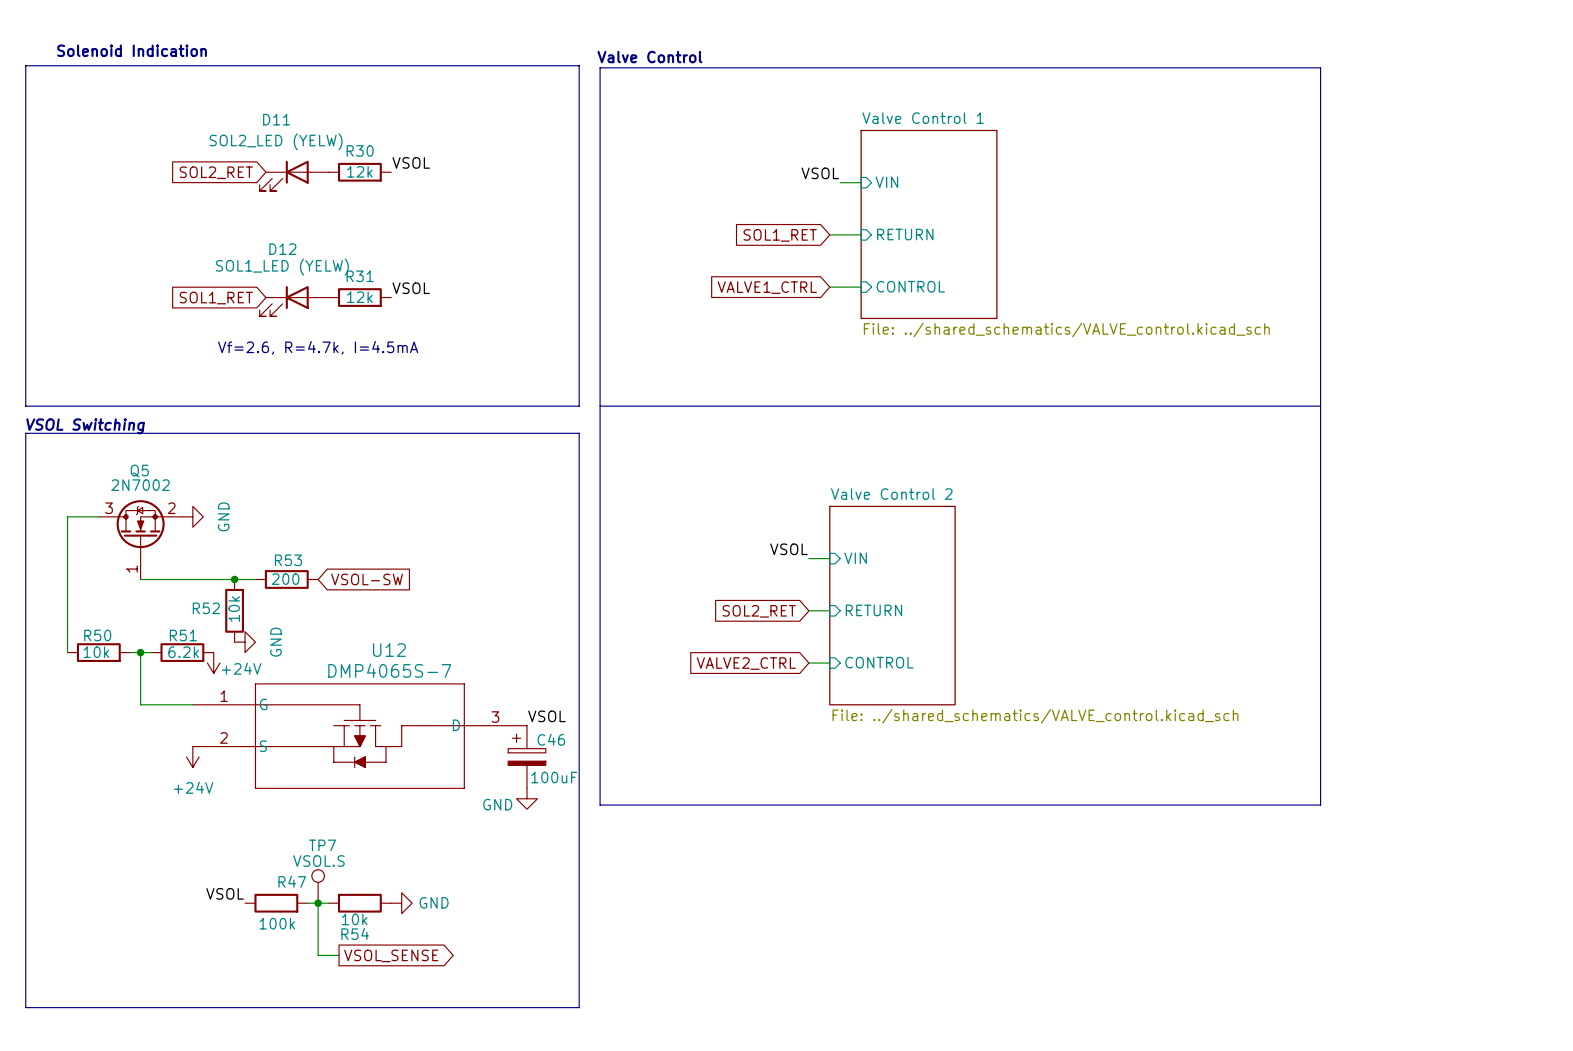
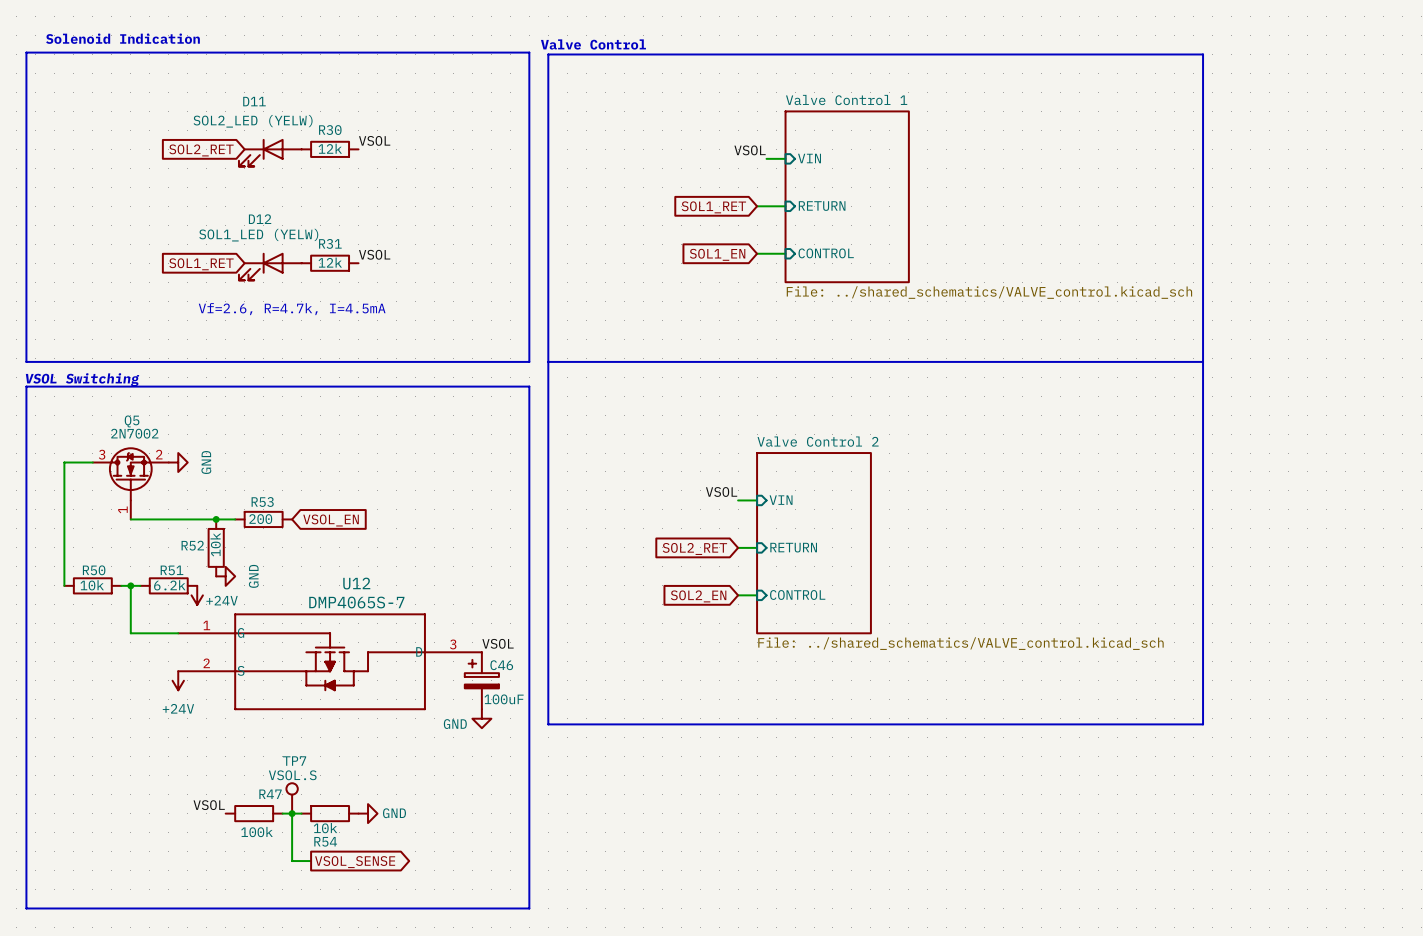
global label: VALVE1_CTRL (767, 287) -> SOL1_EN (717, 254)
global label: VSOL-SW (367, 579) -> VSOL_EN (331, 520)
global label: VALVE2_CTRL (746, 663) -> SOL2_EN (698, 596)

